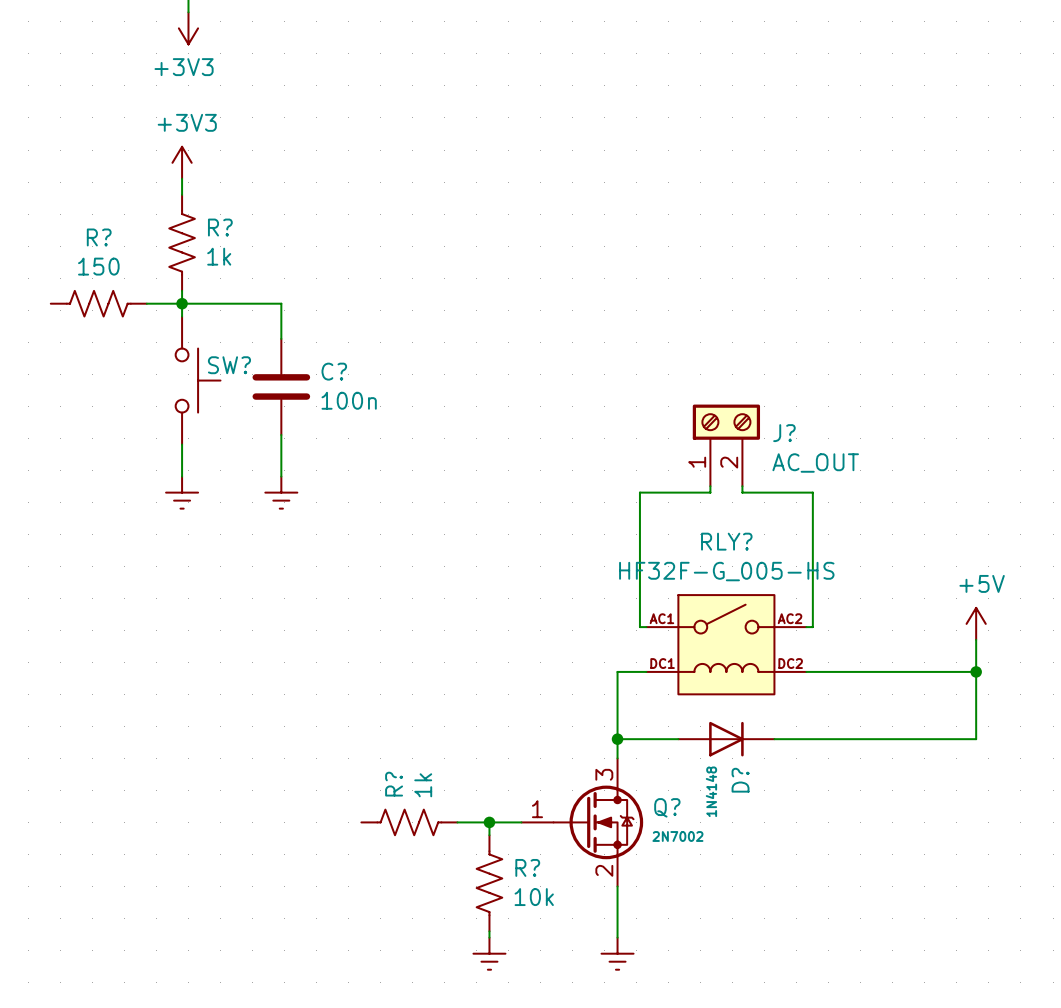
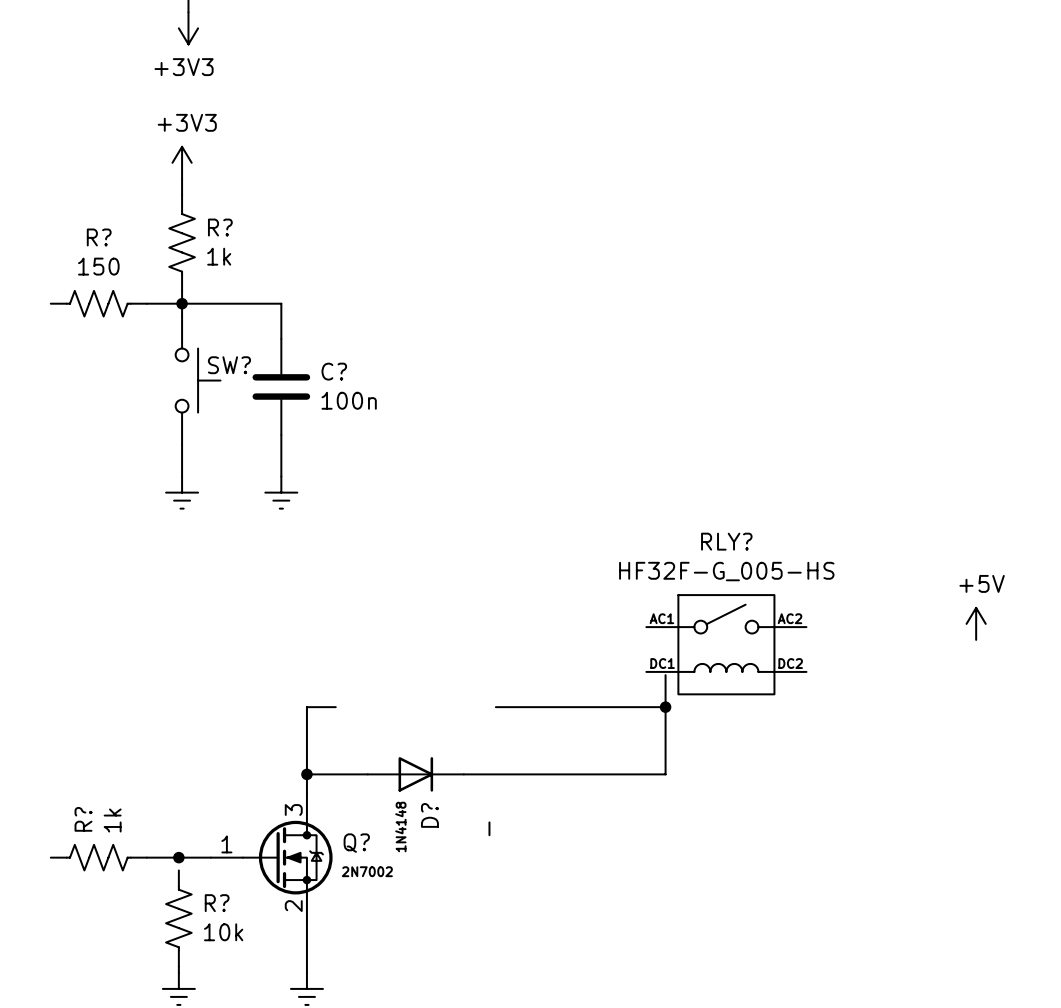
J?: AC_OUT (726, 445) -> none
wire: (710, 486) (710, 492) (639, 492) (639, 627) (646, 627) -> none
wire: (742, 486) (742, 492) (812, 492) (812, 627) (806, 627) -> none
wire: (976, 639) (976, 739) (774, 739) -> (665, 675) (665, 774) (463, 774)
wire: (646, 671) (617, 671) (617, 758) -> (335, 707) (306, 707) (306, 793)
wire: (806, 671) (976, 671) -> (495, 707) (665, 707)
junction: (976, 671) -> none
wire: (617, 739) (678, 739) -> (306, 774) (367, 774)
junction position: (617, 739) -> (665, 707)
D? position: (726, 739) -> (415, 774)
junction: none -> (306, 774)
R? position: (409, 822) -> (98, 857)
wire: (457, 822) (521, 822) -> (146, 857) (210, 857)
junction: (489, 822) -> none
Q? position: (582, 822) -> (271, 857)
junction: none -> (178, 857)
R? position: (489, 883) -> (178, 918)
wire: (617, 886) (617, 937) -> (306, 921) (306, 972)
wire: (489, 931) (489, 937) -> (178, 966) (178, 972)
power symbol: (489, 953) -> none
power symbol: (617, 953) -> none
power symbol: none -> (178, 988)
power symbol: none -> (306, 988)

